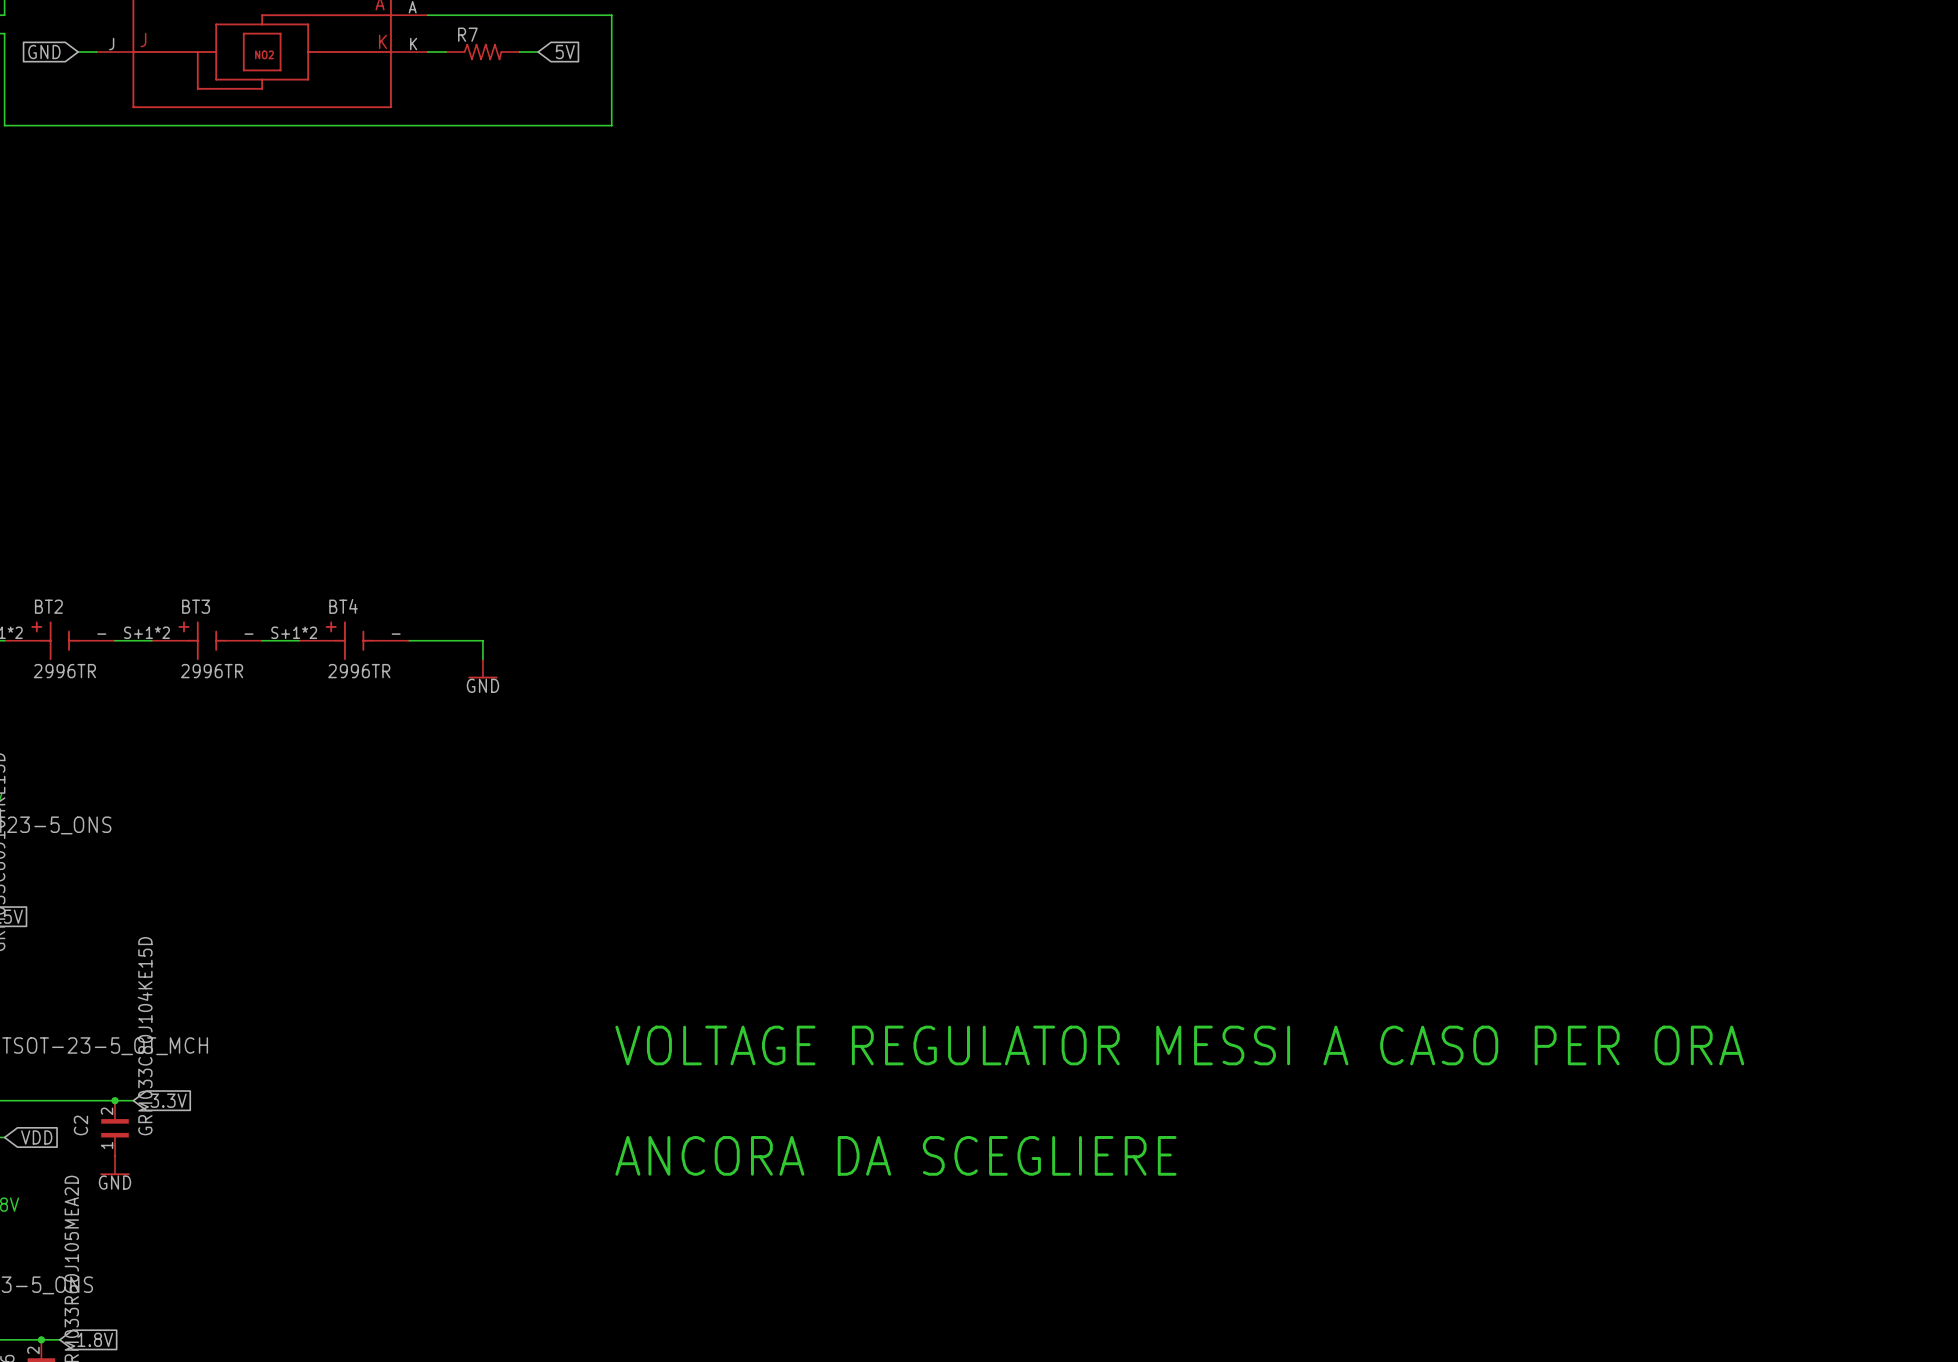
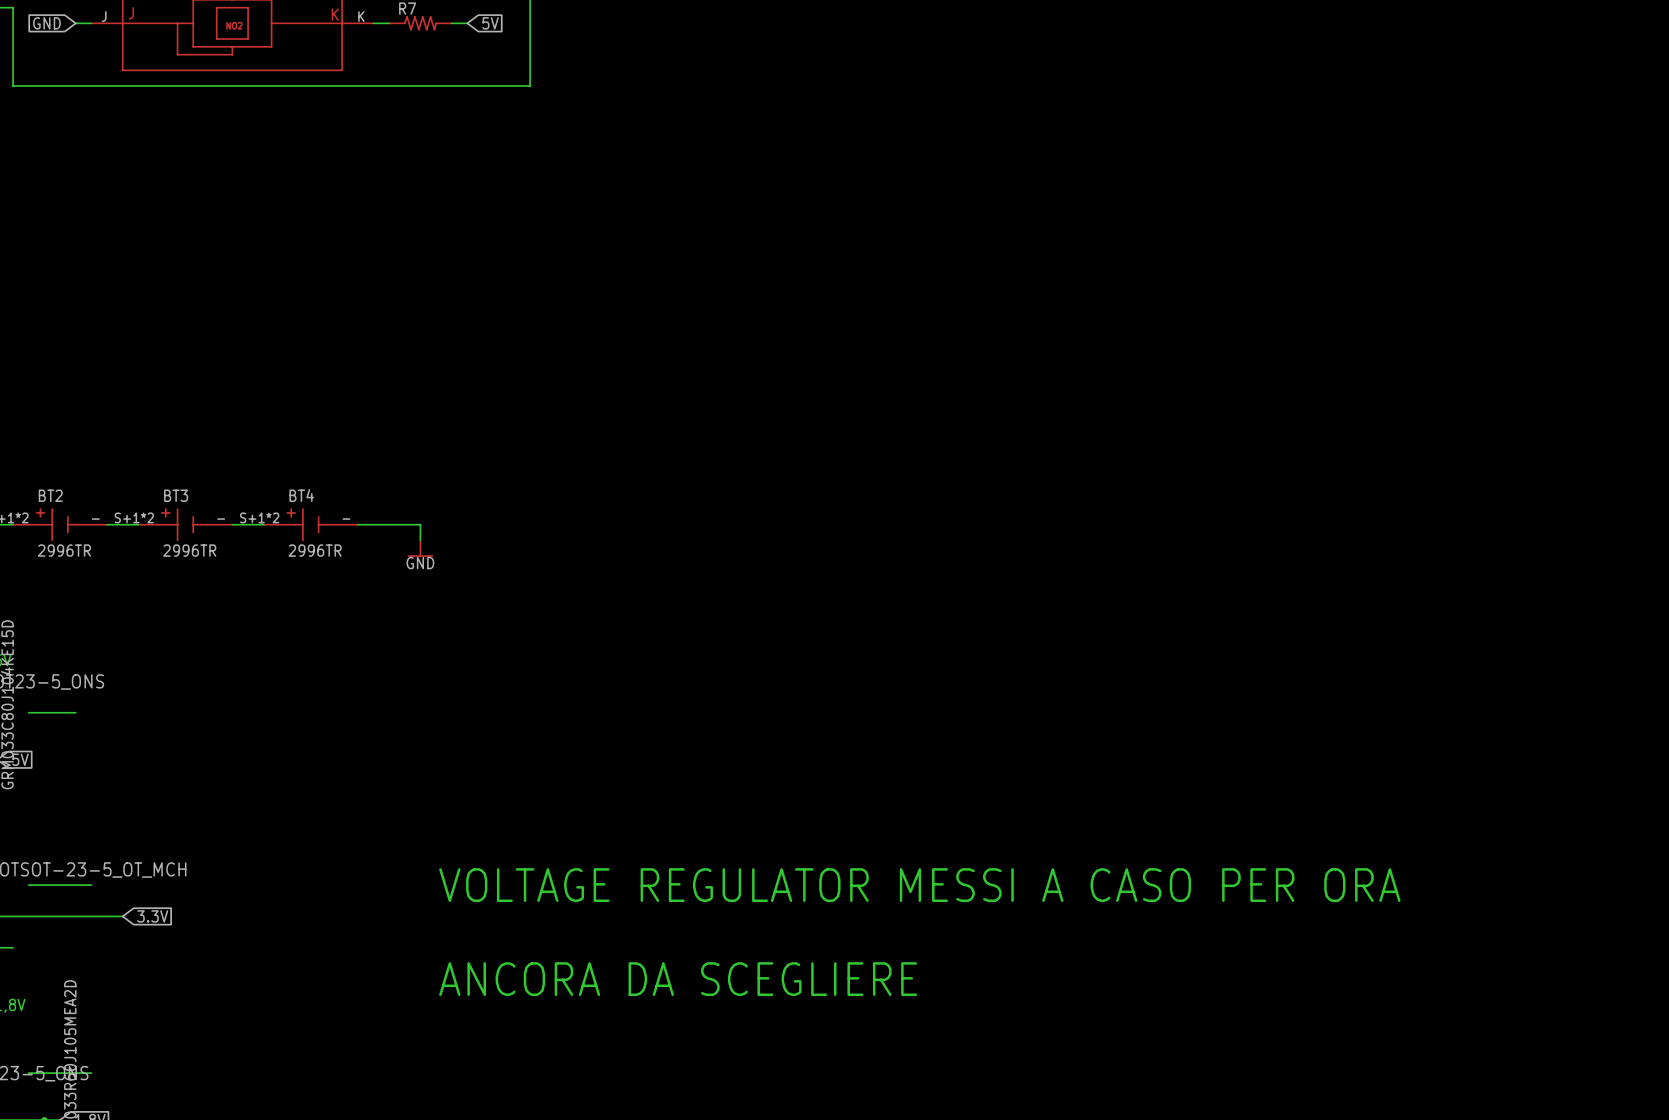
wire: none -> (28, 712) (75, 712)
text position: VOLTAGE REGULATOR MESSI A CASO PER ORA (1179, 1045) -> VOLTAGE REGULATOR MESSI A CASO PER ORA (919, 885)
wire: none -> (28, 885) (91, 885)
junction: (114, 1100) -> none
C2: GRM033C80J104KE15D (115, 1128) -> none
global label: VDD (36, 1137) -> none
text position: ANCORA DA SCEGLIERE (895, 1155) -> ANCORA DA SCEGLIERE (678, 979)
power symbol: GND (114, 1165) -> none
wire: none -> (28, 1073) (91, 1073)

